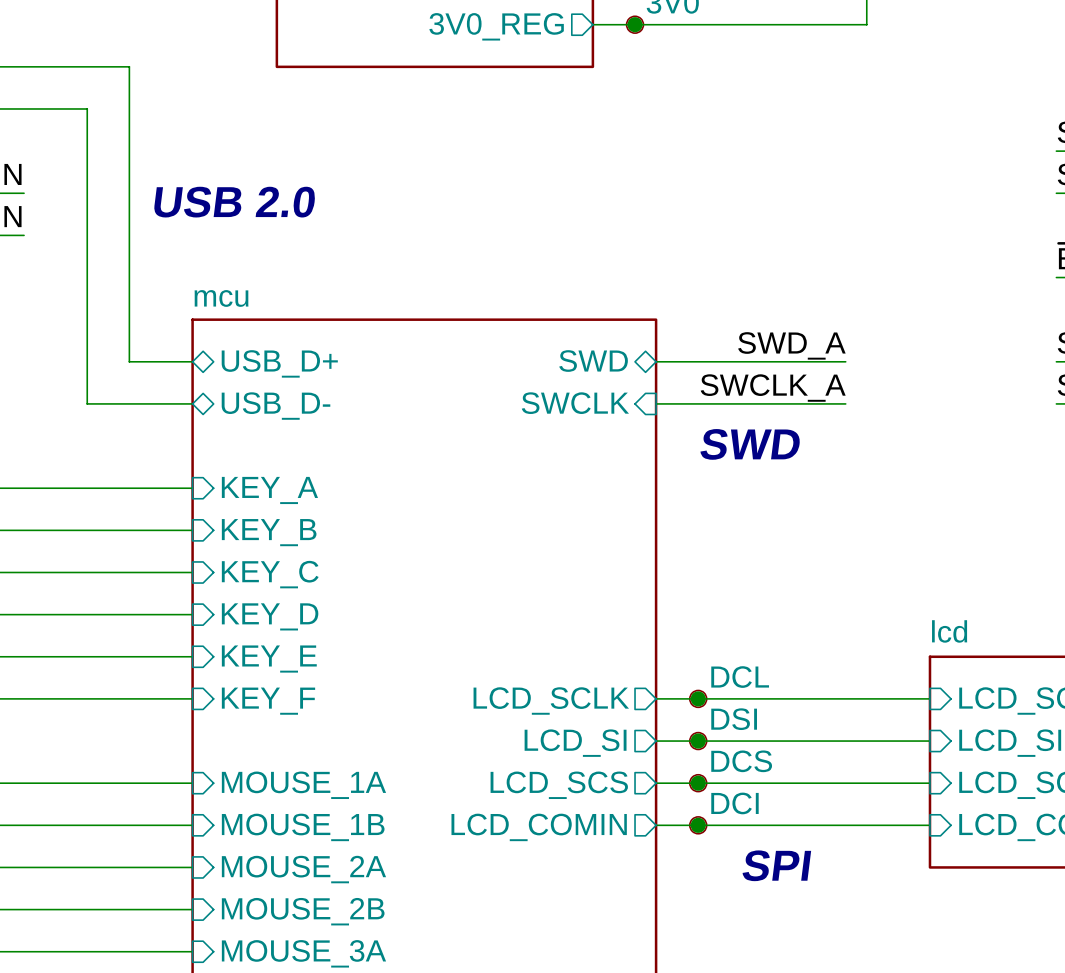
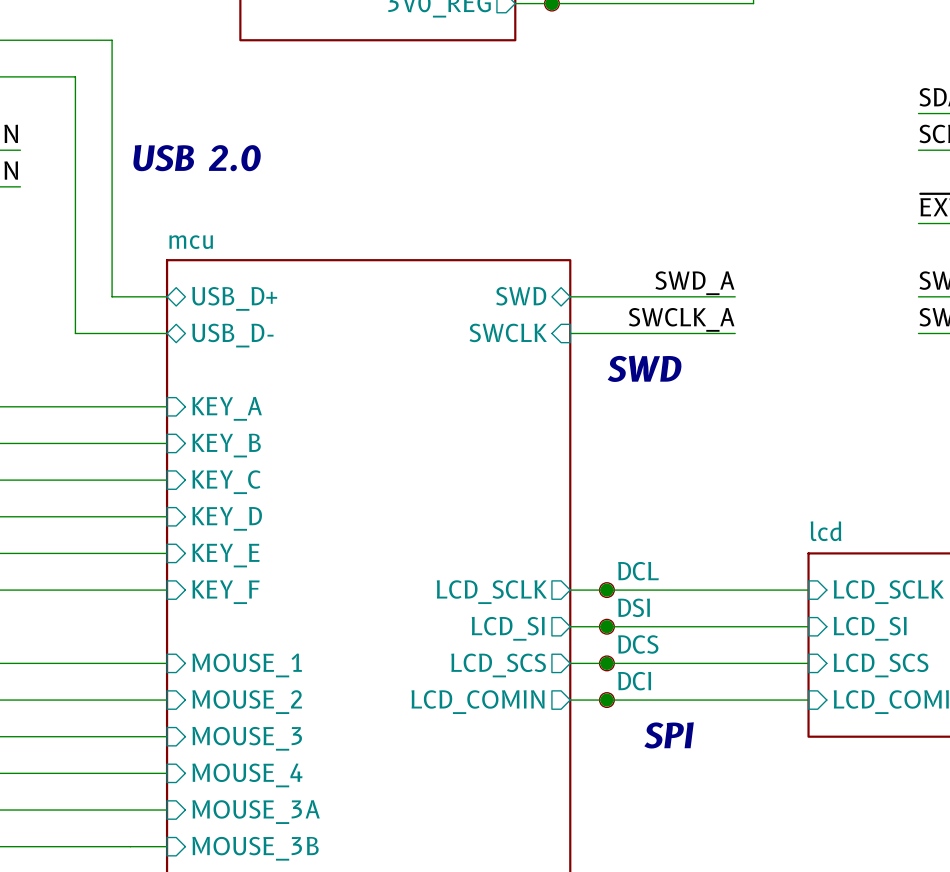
sheet pin: MOUSE_1A (303, 785) -> MOUSE_1 (247, 665)
sheet pin: MOUSE_1B (303, 827) -> MOUSE_2 (247, 702)
sheet pin: MOUSE_2A (303, 869) -> MOUSE_3 (247, 738)
sheet pin: MOUSE_2B (303, 911) -> MOUSE_4 (247, 775)

